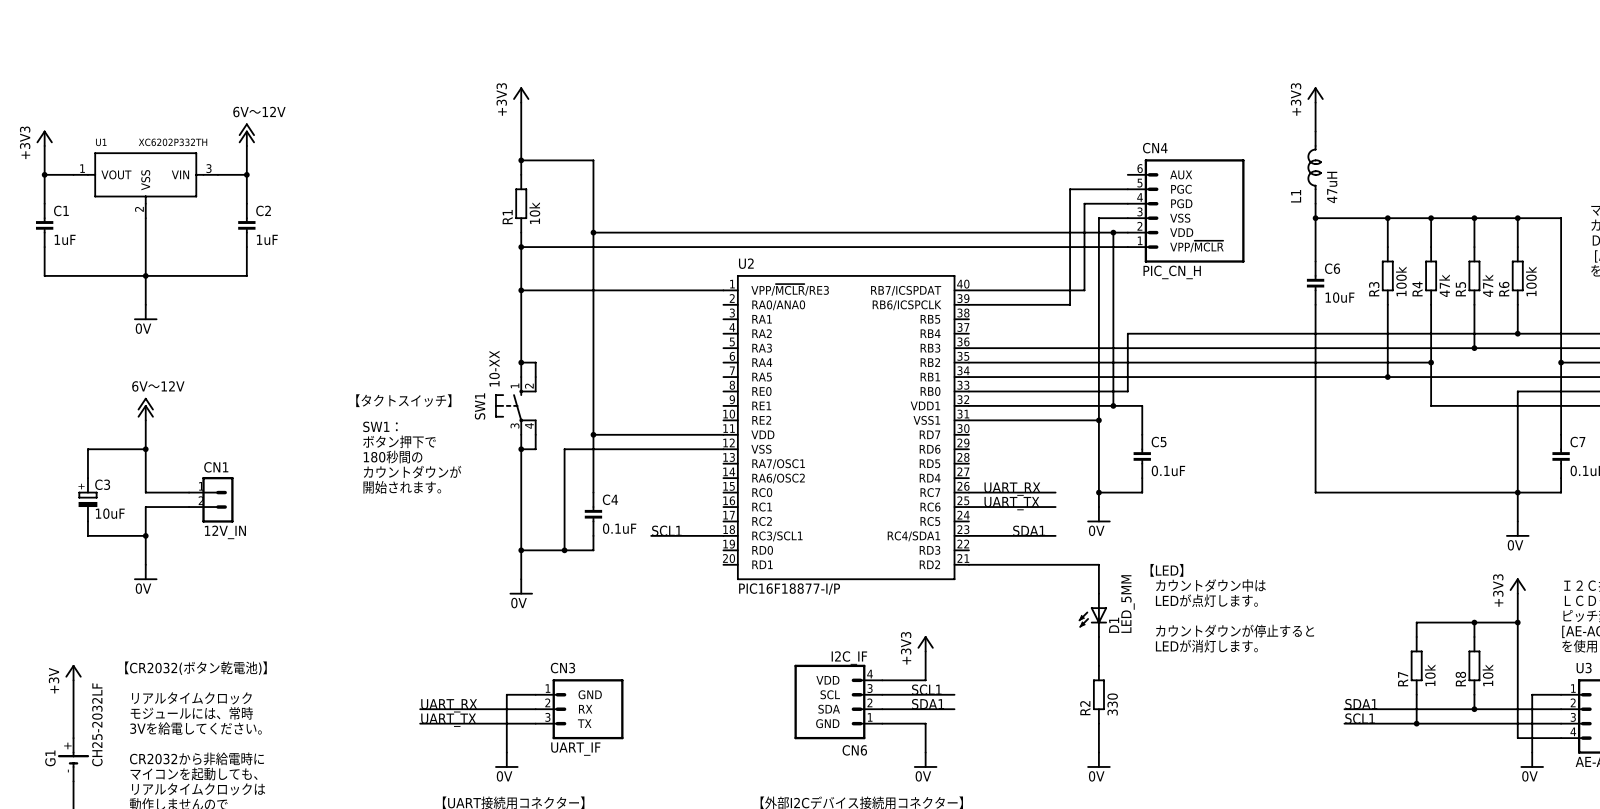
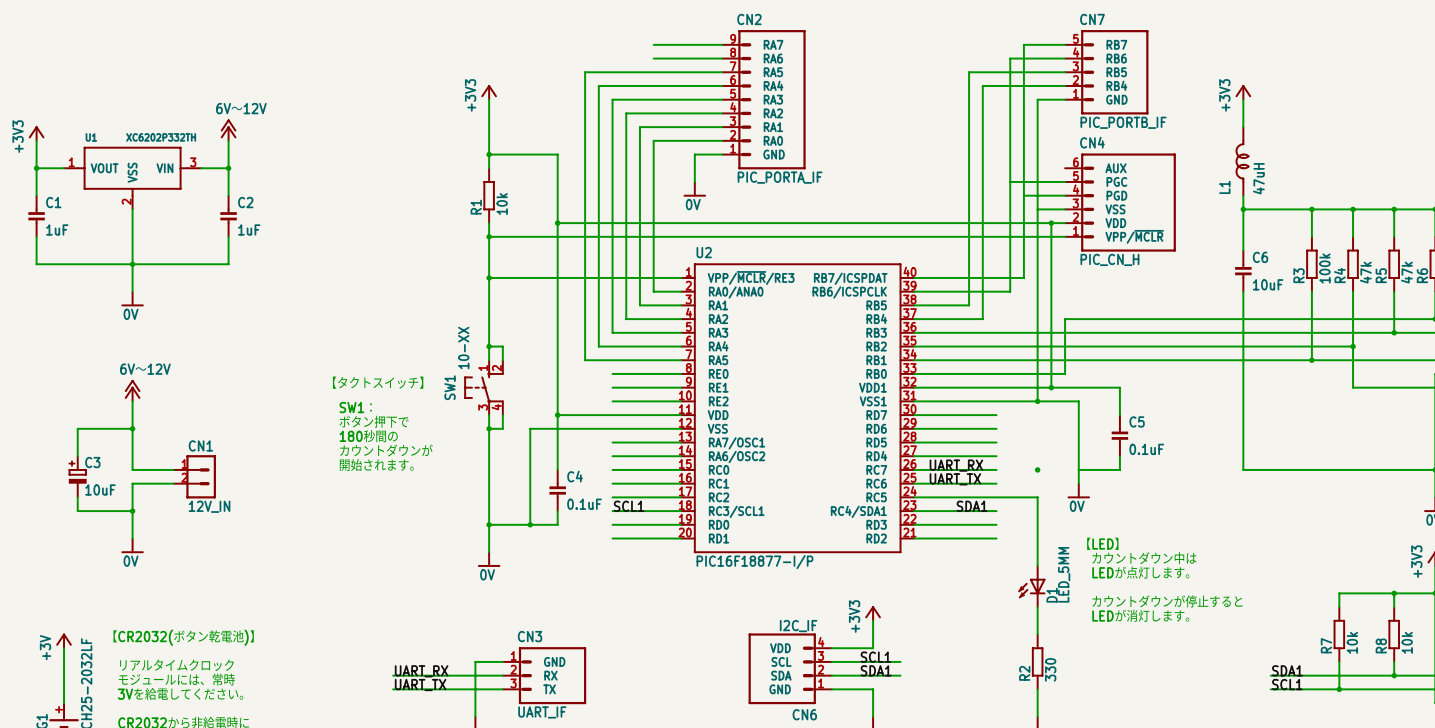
wire: none -> (653, 44) (722, 44)
wire: none -> (1065, 44) (1023, 44) (1023, 195)
wire: none -> (653, 58) (722, 58)
wire: none -> (1065, 58) (1010, 58) (1010, 181)
wire: none -> (722, 72) (585, 72) (585, 360) (681, 360)
wire: none -> (1065, 72) (969, 72) (969, 305) (914, 305)
CN7: none -> PIC_PORTB_IF (1106, 72)
wire: none -> (722, 85) (598, 85) (598, 346) (681, 346)
wire: none -> (1065, 85) (982, 85) (982, 319) (914, 319)
wire: none -> (722, 99) (612, 99) (612, 332) (681, 332)
CN2: none -> PIC_PORTA_IF (763, 99)
wire: none -> (1065, 99) (1037, 99) (1037, 209)
wire: none -> (722, 113) (626, 113) (626, 319) (681, 319)
wire: none -> (722, 127) (639, 127) (639, 305) (681, 305)
wire: none -> (722, 140) (653, 140) (653, 291) (681, 291)
wire: none -> (722, 154) (694, 154) (694, 181)
power symbol: none -> 0V (694, 189)
wire: none -> (612, 373) (681, 373)
wire: none -> (612, 387) (681, 387)
wire: (1142, 405) (1142, 420) -> (1078, 387) (1119, 387) (1119, 415)
wire: none -> (612, 401) (681, 401)
wire: (1098, 420) (1098, 507) -> (1037, 401) (1078, 401)
wire: none -> (914, 415) (996, 415)
wire: none -> (914, 428) (996, 428)
C5 position: (1142, 456) -> (1119, 435)
wire: none -> (612, 442) (681, 442)
wire: none -> (914, 442) (996, 442)
wire: none -> (612, 456) (681, 456)
wire: none -> (914, 456) (996, 456)
wire: none -> (1119, 456) (1119, 469) (1078, 469) (1078, 483)
wire: none -> (612, 469) (681, 469)
wire: (1098, 492) (1142, 492) -> none
wire: none -> (612, 483) (681, 483)
power symbol position: 0V (1098, 514) -> 0V (1078, 490)
wire: none -> (612, 497) (681, 497)
wire: none -> (612, 524) (681, 524)
wire: none -> (914, 524) (996, 524)
wire: none -> (612, 538) (681, 538)
wire: (1055, 564) (1098, 564) -> (914, 497) (1037, 497) (1037, 538)

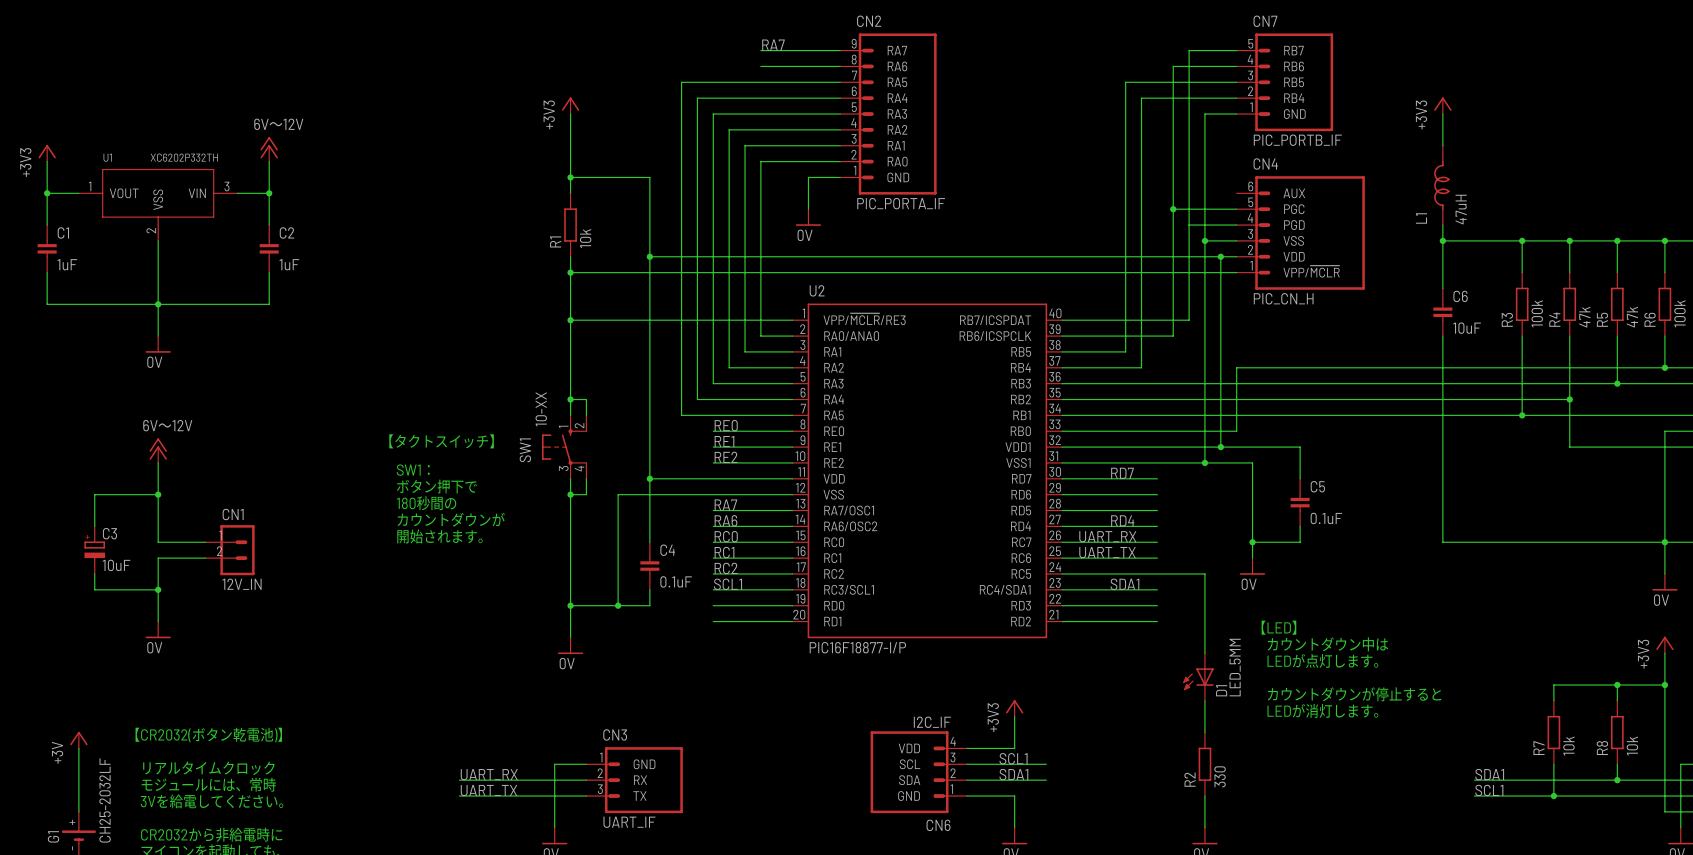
label: none -> RA7 (773, 45)
junction: none -> (1173, 209)
junction: none -> (1204, 240)
label: none -> RE0 (726, 425)
label: none -> RE1 (724, 441)
label: none -> RE2 (726, 457)
label: none -> RD7 (1122, 473)
label: none -> RA7 (725, 504)
label: none -> RA6 (725, 520)
label: none -> RD4 (1122, 520)
label: none -> RC0 (726, 536)
junction: (1037, 469) -> none
junction: none -> (1252, 542)
label: none -> RC1 (724, 552)
label: none -> RC2 (726, 568)

